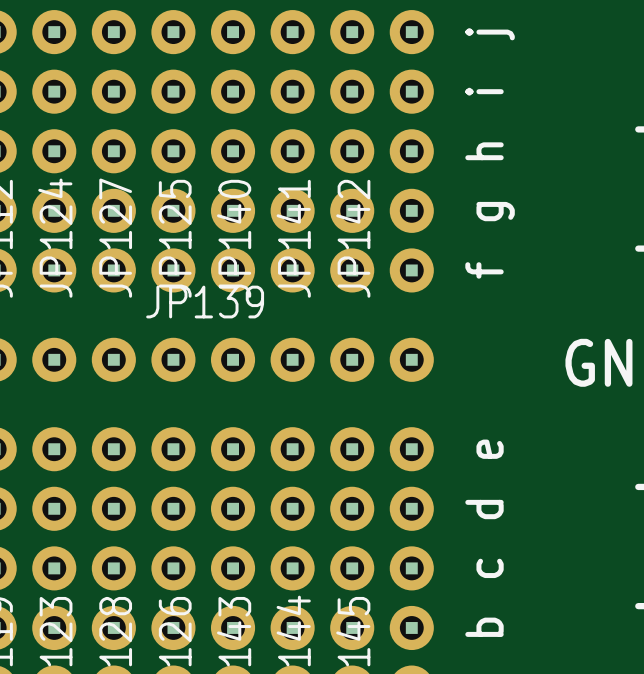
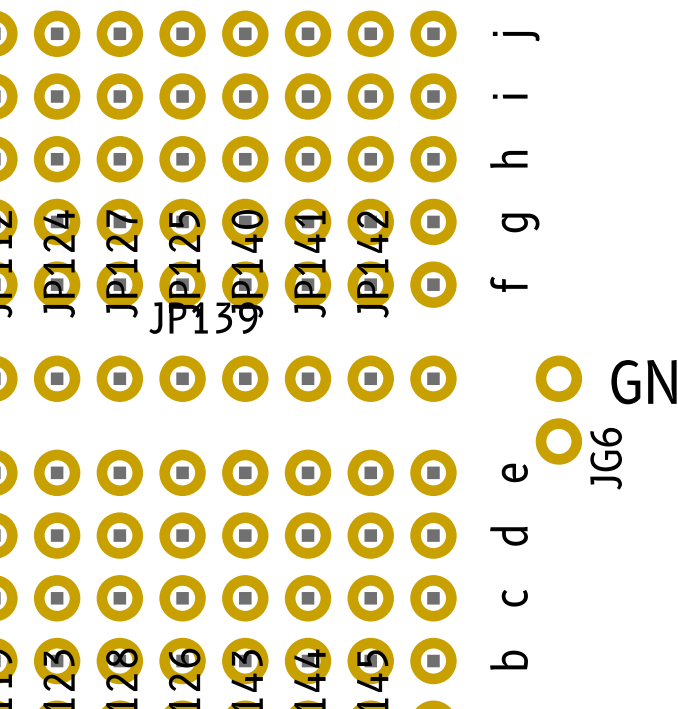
part: none -> (558, 410)
text: none -> JG6 (606, 458)

